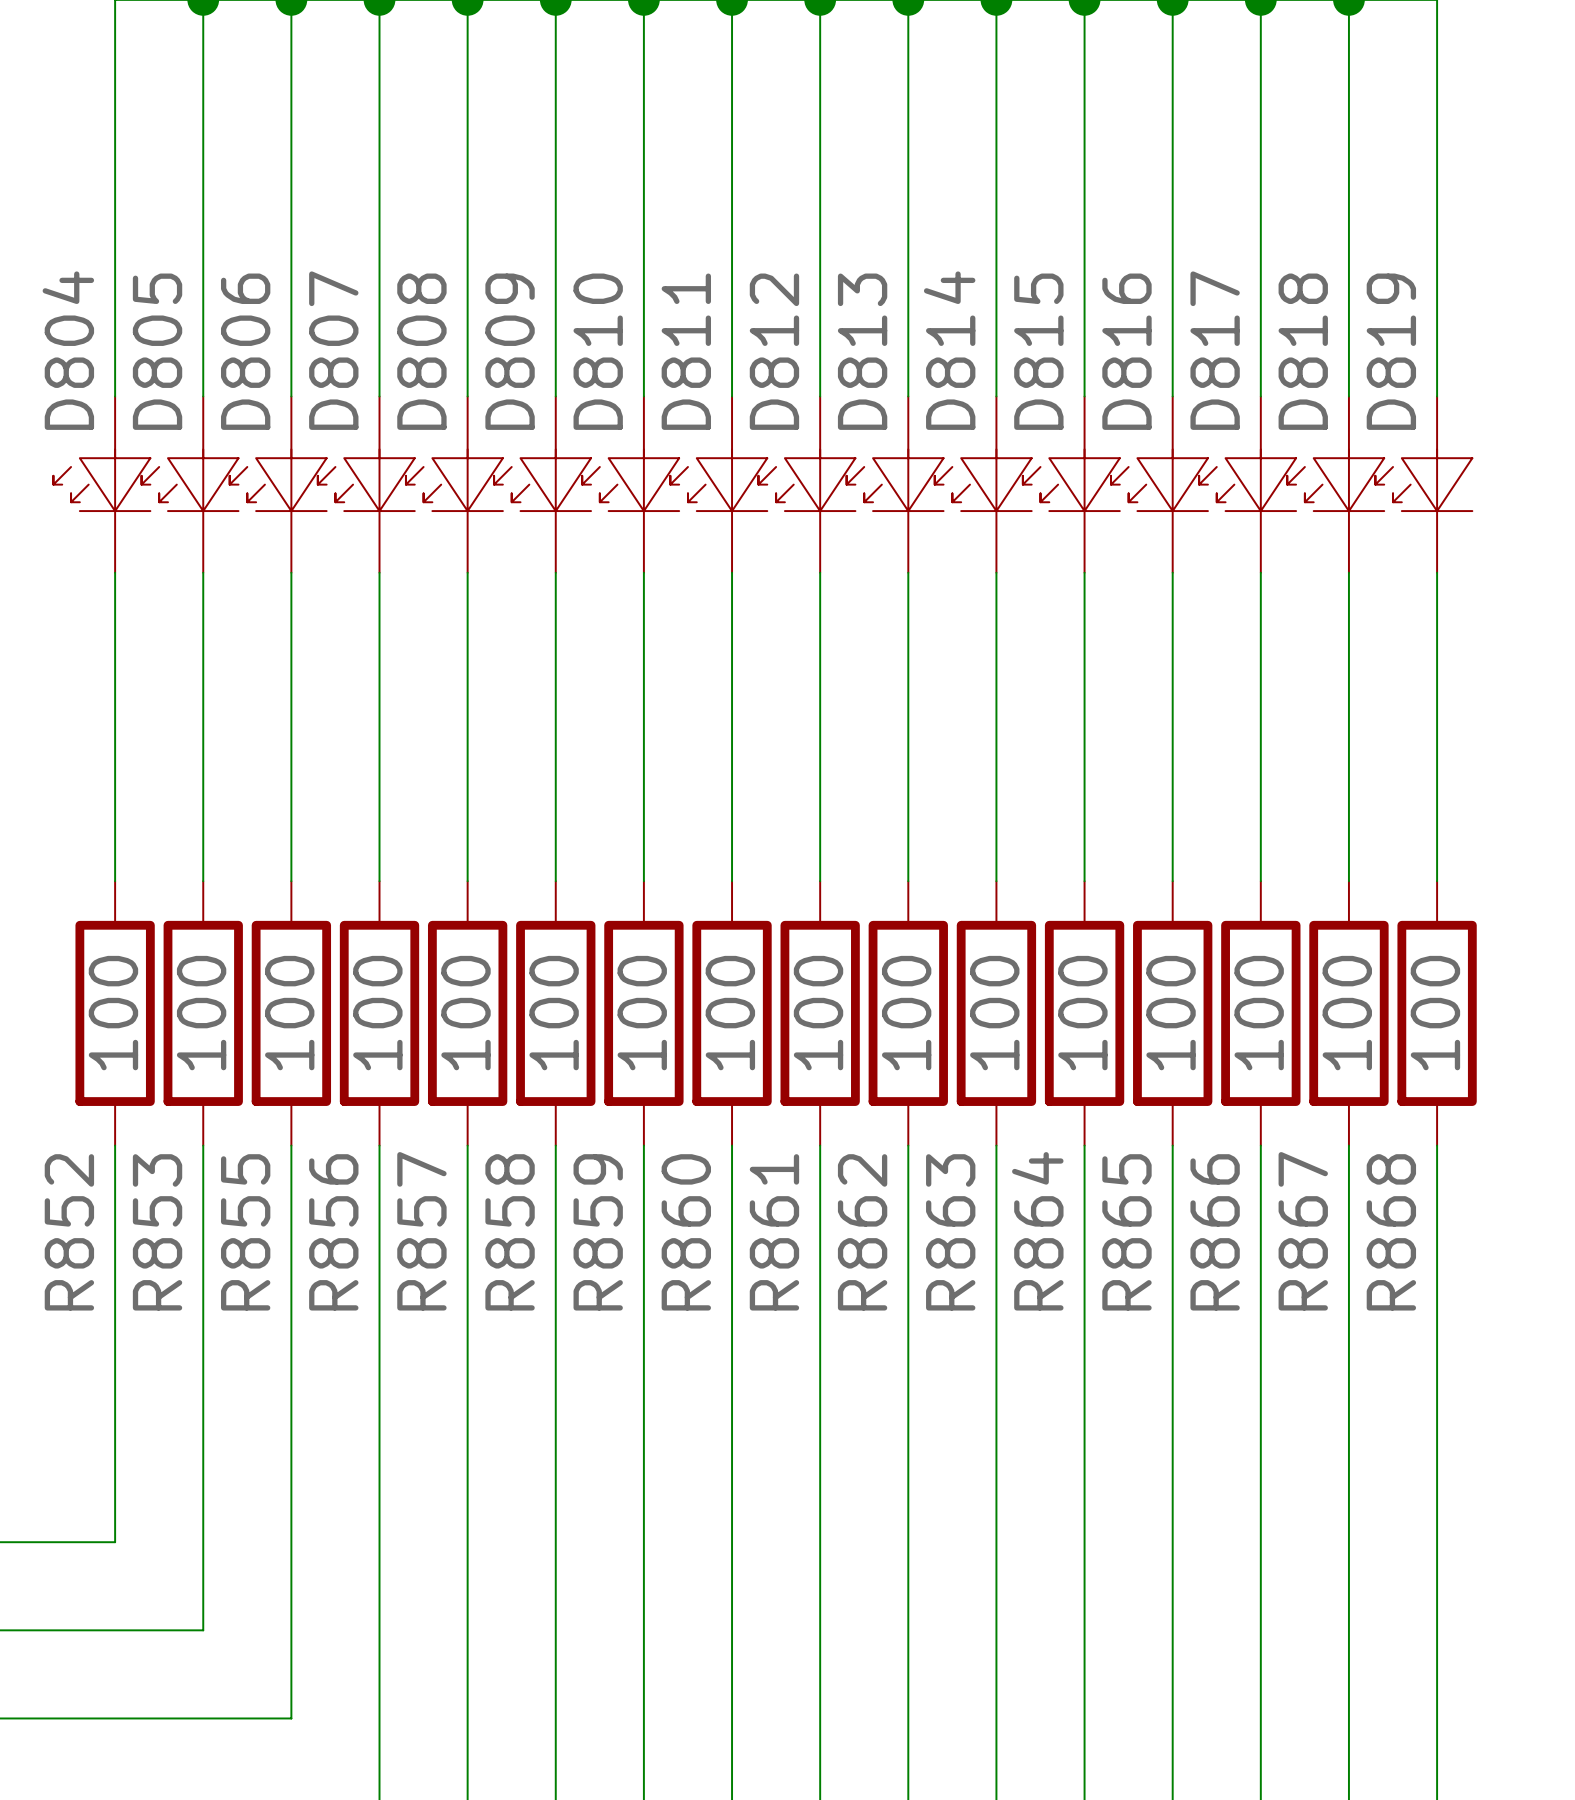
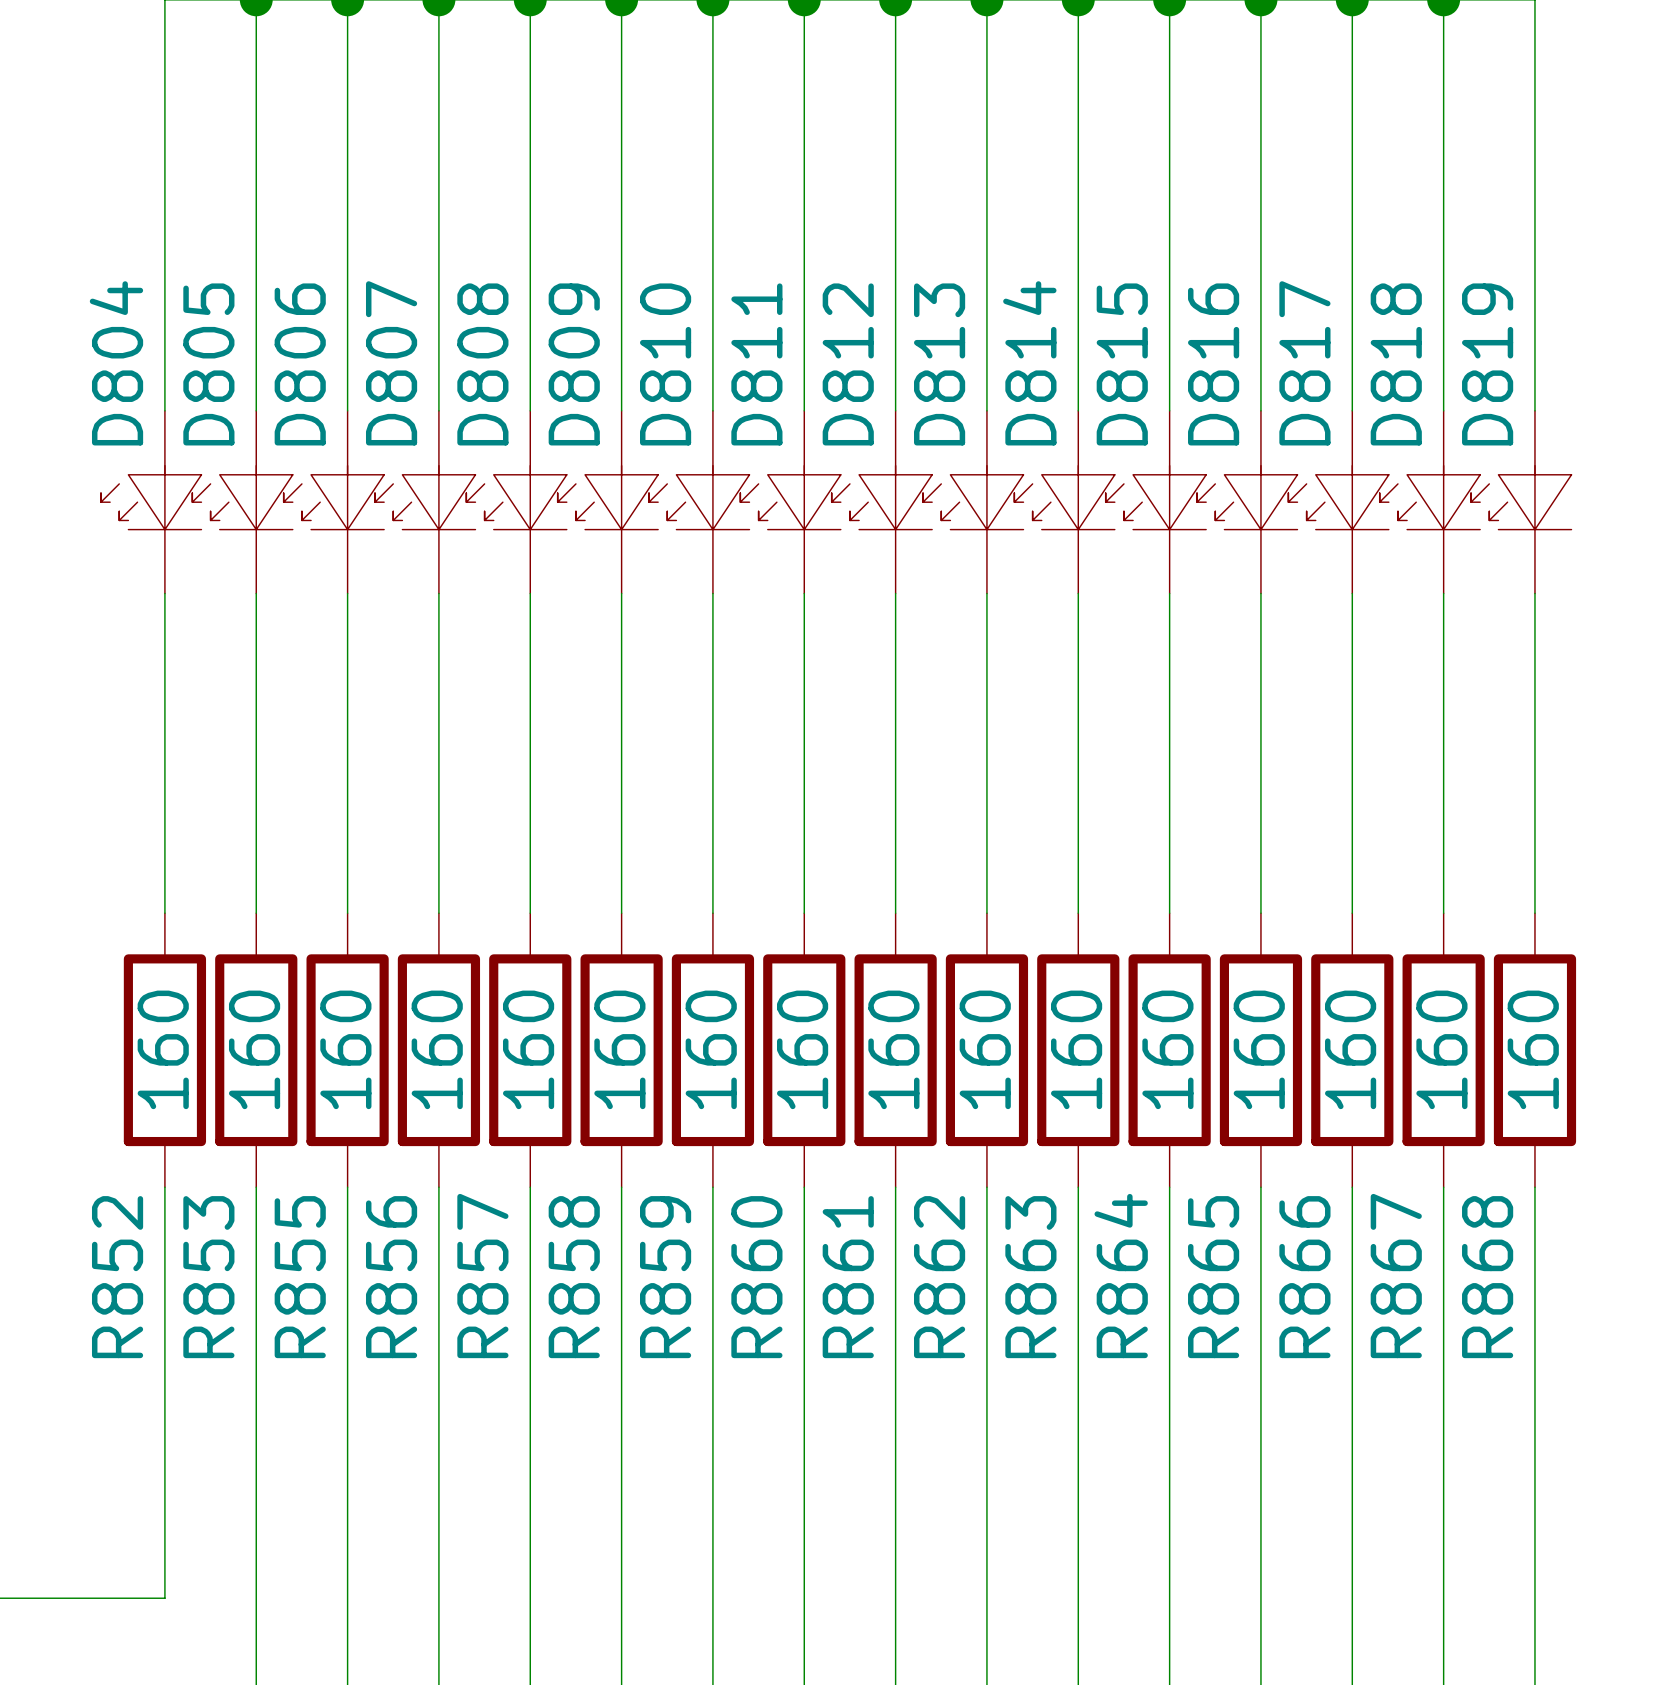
R852 value: 100 (113, 1013) -> 160 (163, 1049)
R853 value: 100 (201, 1013) -> 160 (254, 1049)
R855 value: 100 (289, 1013) -> 160 (345, 1049)
R856 value: 100 (377, 1013) -> 160 (437, 1049)
R857 value: 100 (465, 1013) -> 160 (528, 1049)
R858 value: 100 (554, 1013) -> 160 (619, 1049)
R859 value: 100 (642, 1013) -> 160 (711, 1049)
R860 value: 100 (730, 1013) -> 160 (802, 1049)
R861 value: 100 (818, 1013) -> 160 (893, 1049)
R862 value: 100 (906, 1013) -> 160 (985, 1049)
R863 value: 100 (994, 1013) -> 160 (1076, 1049)
R864 value: 100 (1082, 1013) -> 160 (1167, 1049)
R865 value: 100 (1171, 1013) -> 160 (1259, 1049)
R866 value: 100 (1259, 1013) -> 160 (1350, 1049)
R867 value: 100 (1347, 1013) -> 160 (1441, 1049)
R868 value: 100 (1435, 1013) -> 160 (1533, 1049)

